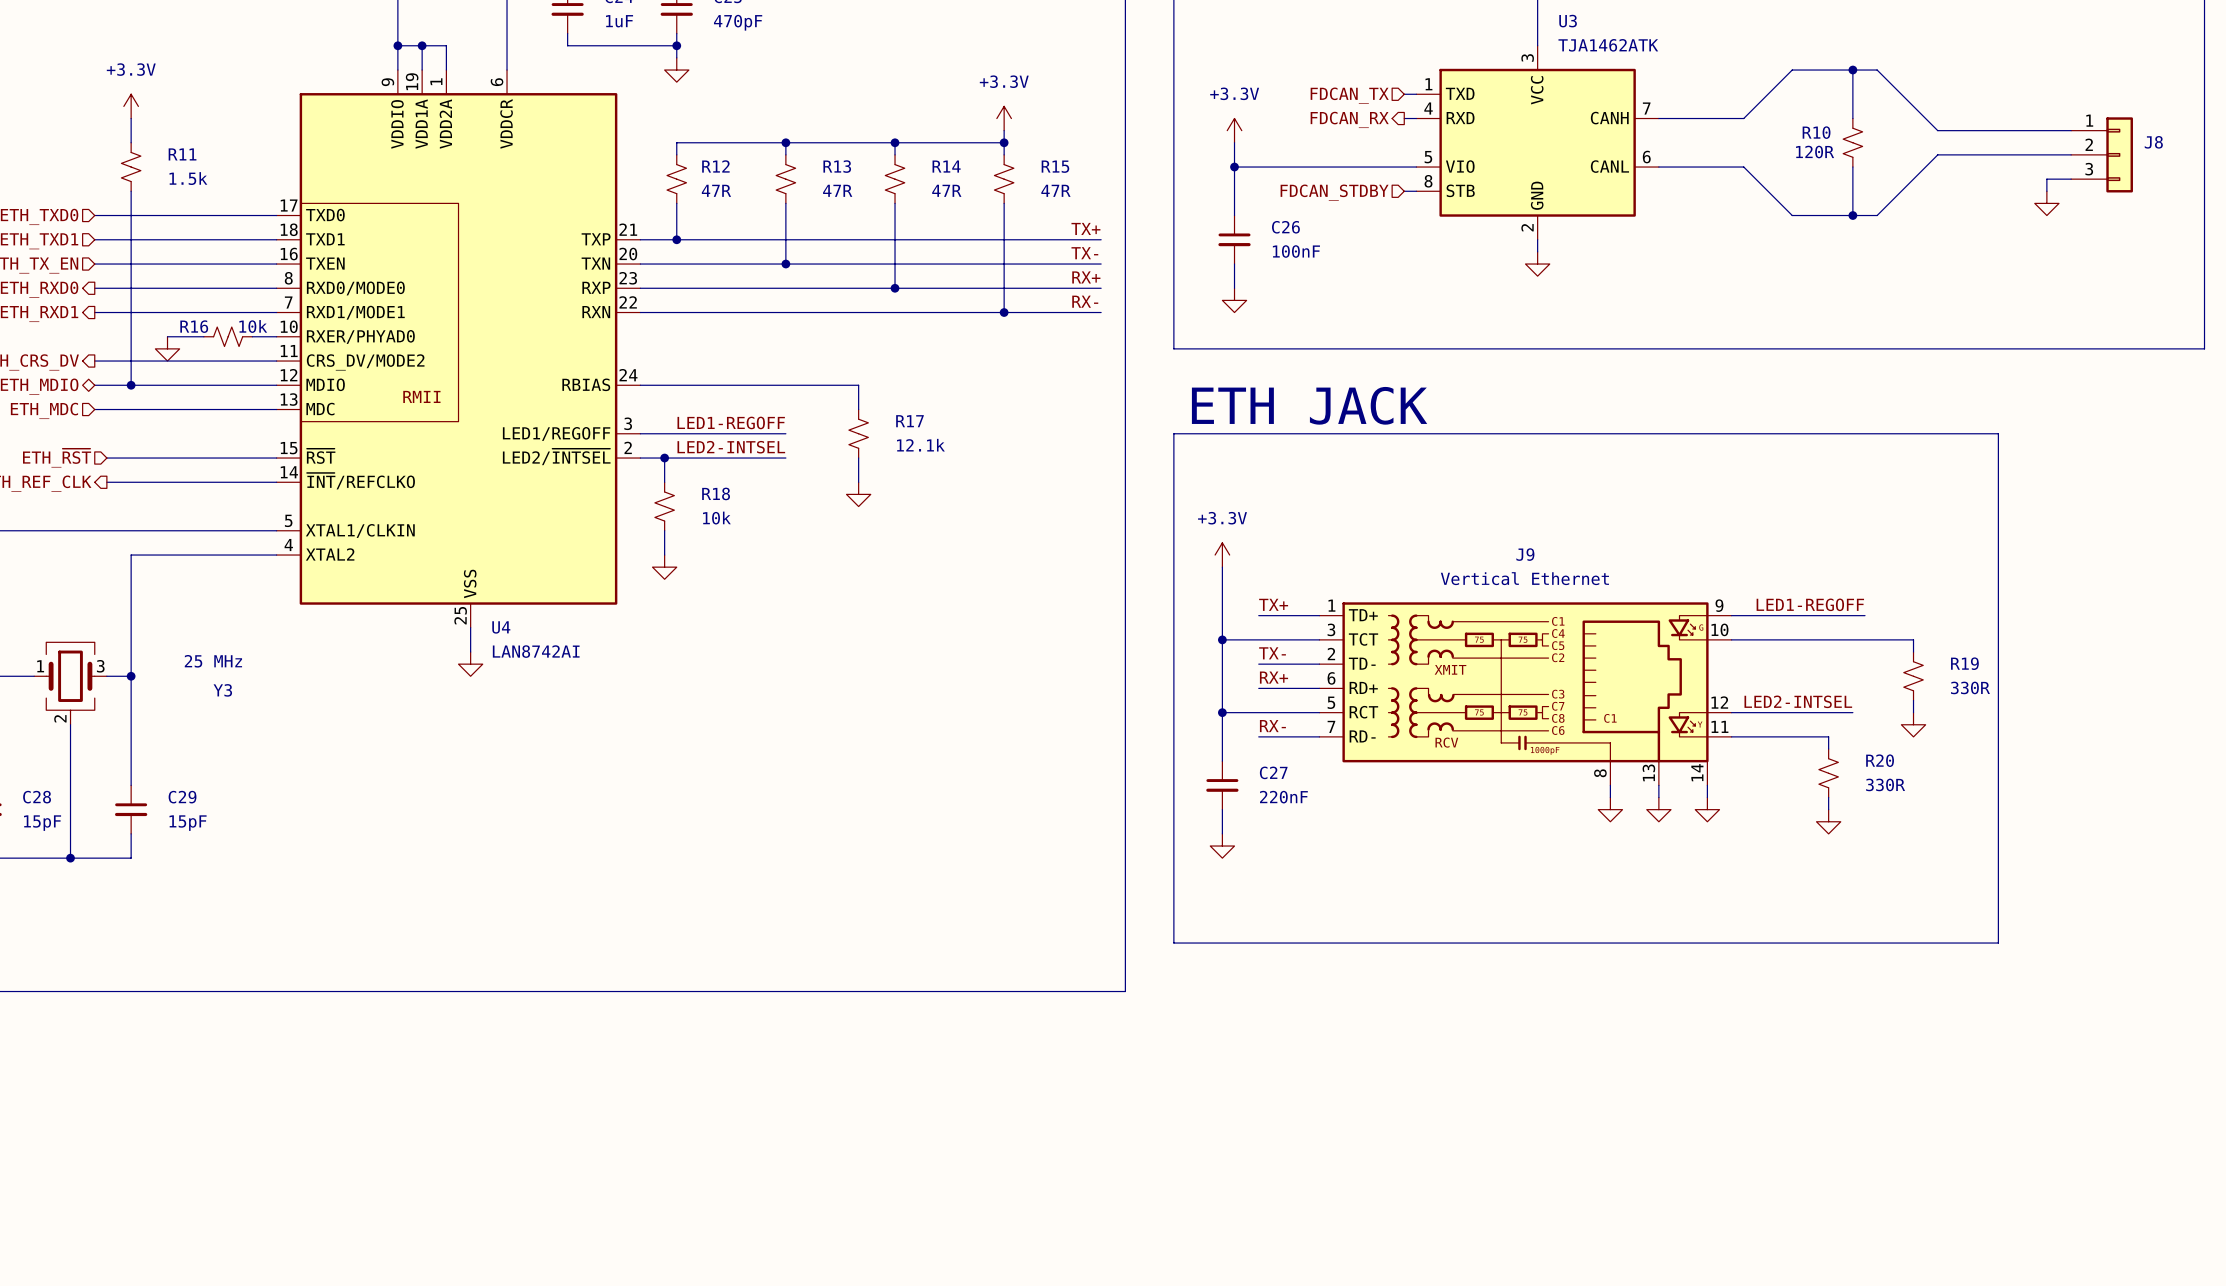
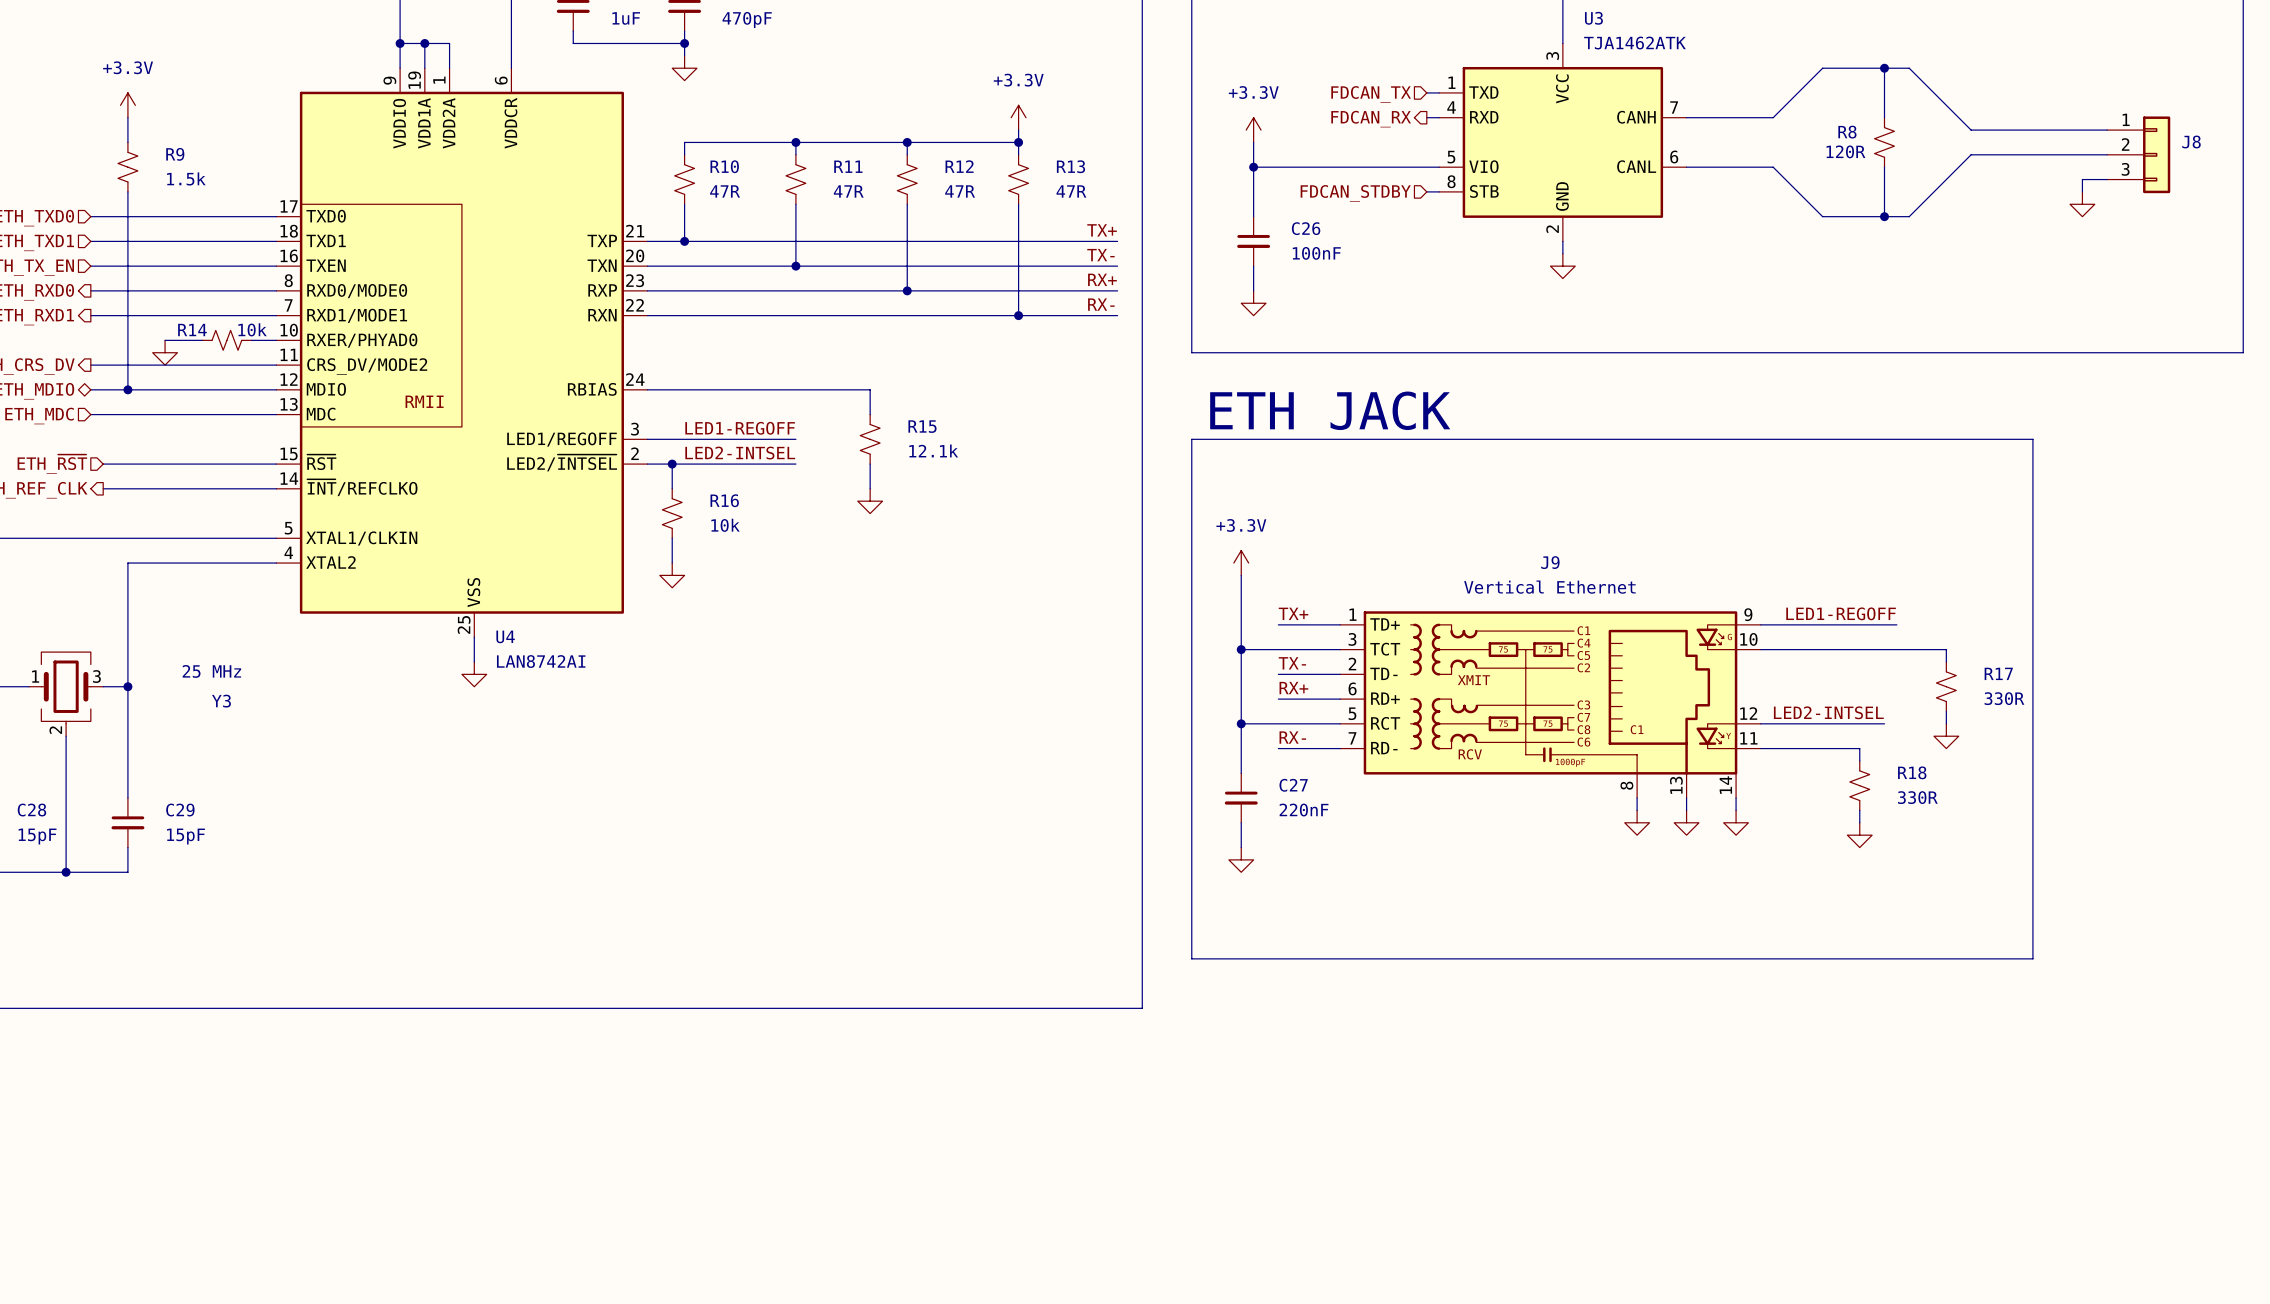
R10 name: R10 (1816, 132) -> R8 (1847, 132)
R11 name: R11 (182, 154) -> R9 (175, 154)
R12 name: R12 (715, 166) -> R10 (724, 166)
R13 name: R13 (837, 166) -> R11 (848, 166)
R14 name: R14 (946, 166) -> R12 (959, 166)
R15 name: R15 (1055, 166) -> R13 (1070, 166)
R16 name: R16 (194, 326) -> R14 (192, 330)
R17 name: R17 (909, 421) -> R15 (922, 426)
R18 name: R18 (716, 493) -> R16 (724, 500)
R19 name: R19 (1964, 663) -> R17 (1998, 673)
R20 name: R20 (1880, 760) -> R18 (1912, 772)

